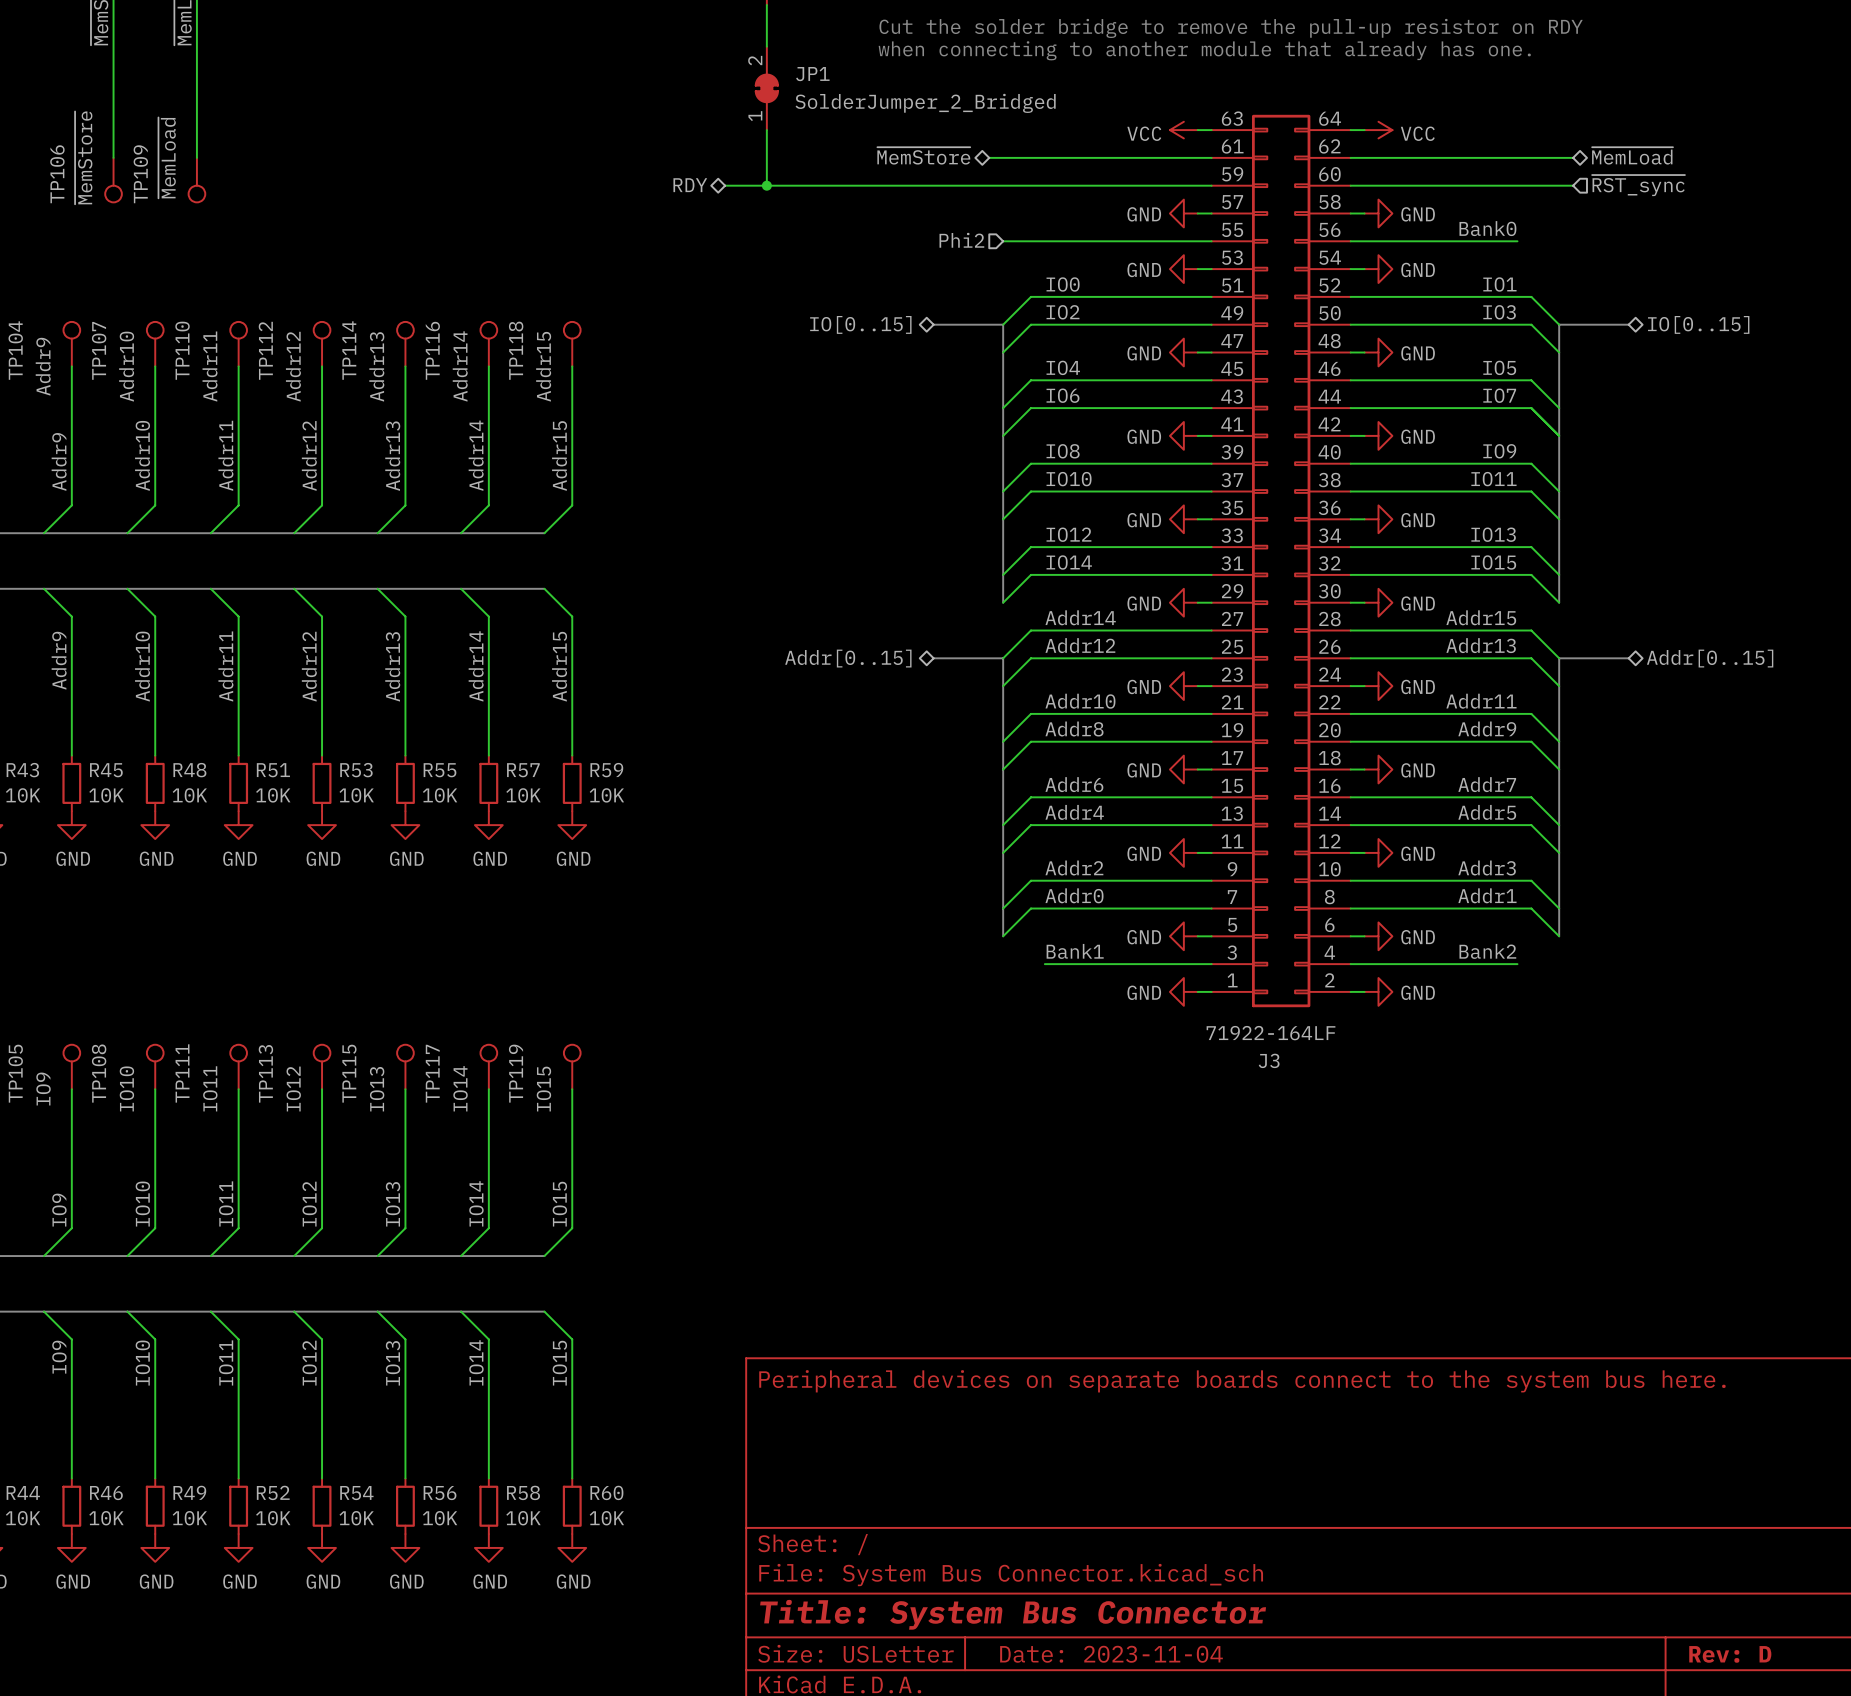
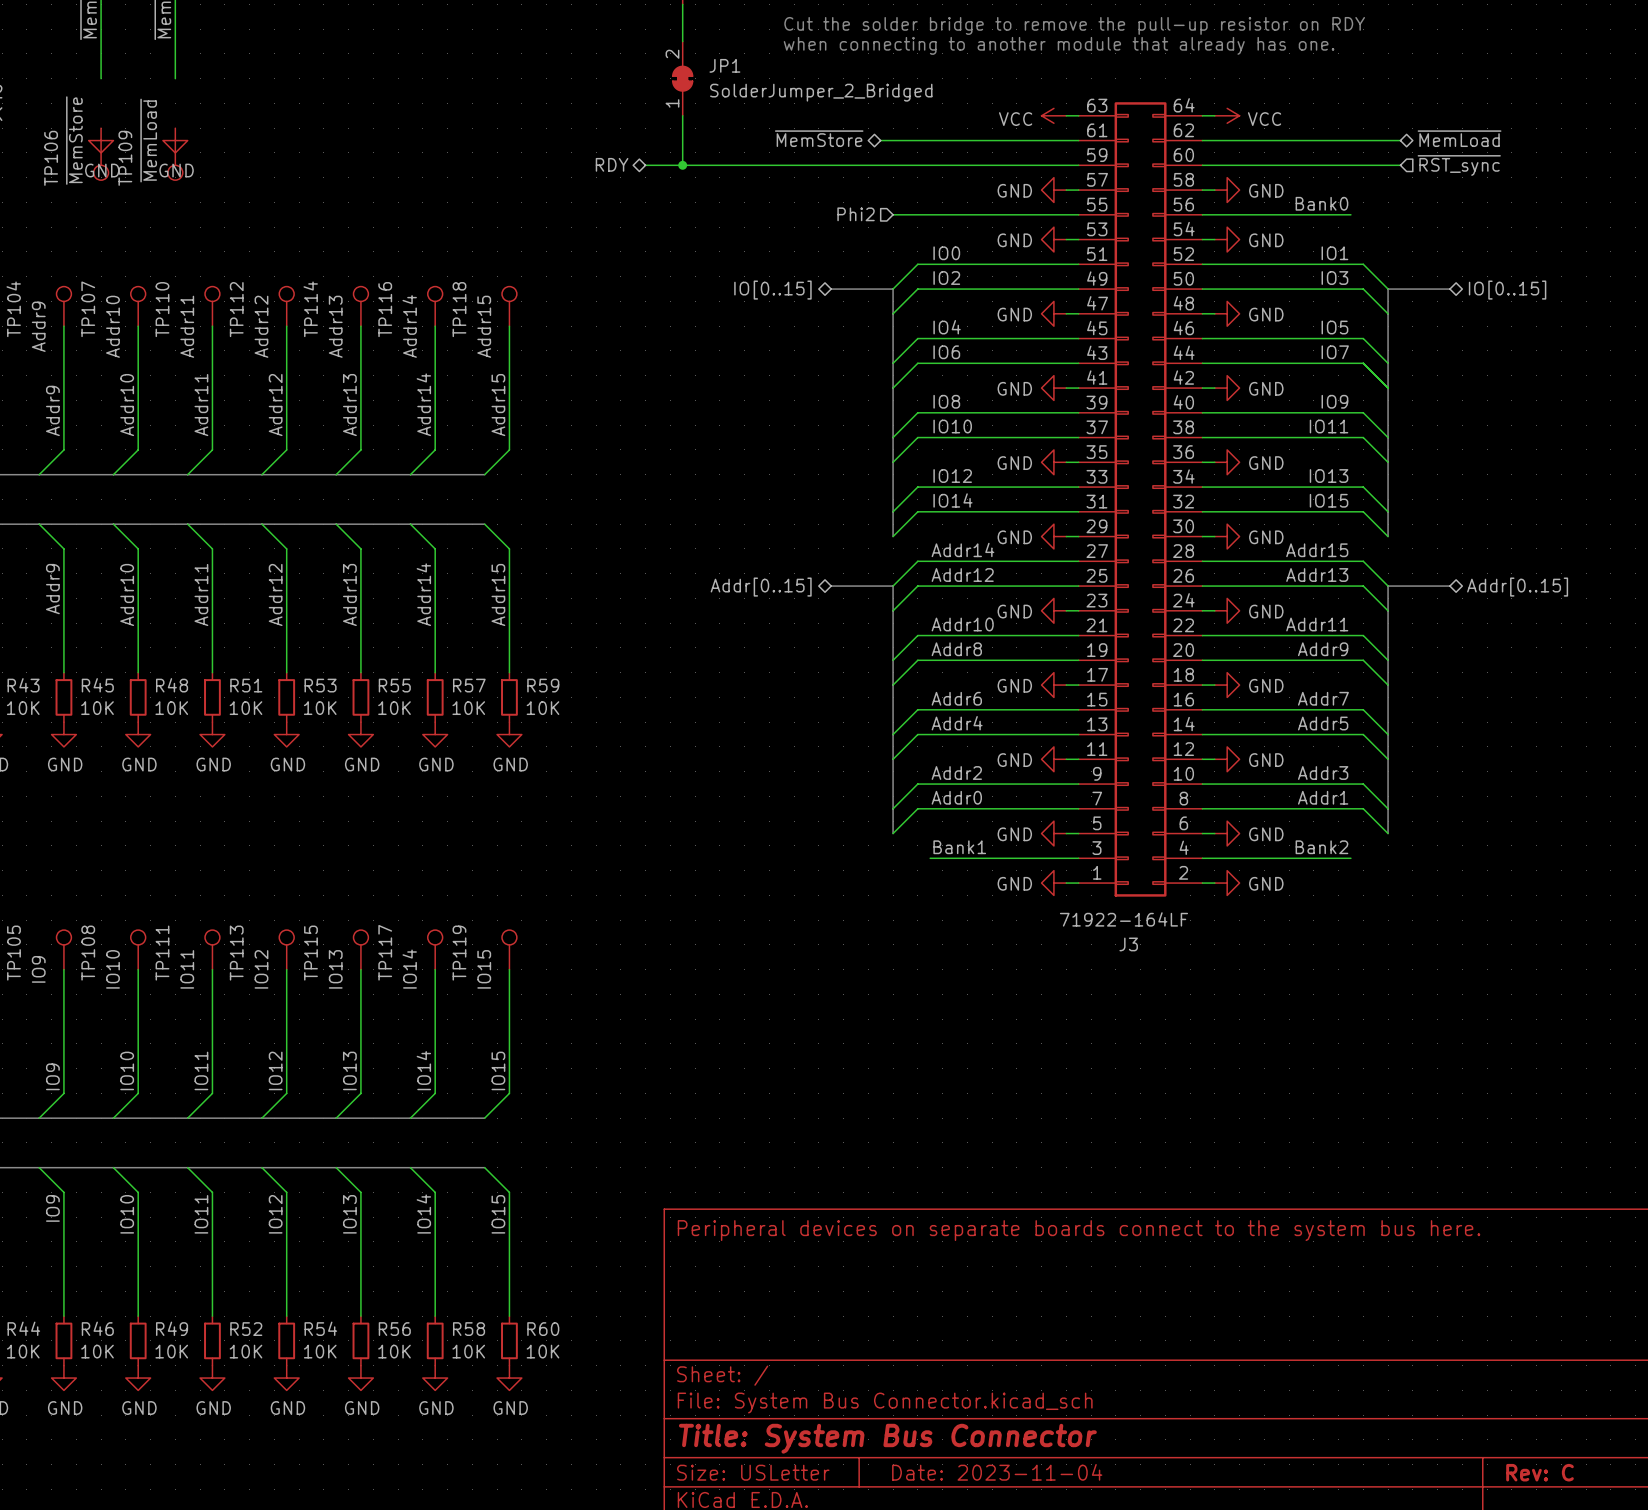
wire: (113, 88) (113, 157) -> none
wire: (196, 88) (196, 157) -> none
power symbol: none -> GND (101, 140)
power symbol: none -> GND (175, 140)
title block: Rev: D (1730, 1654) -> Rev: C (1540, 1472)

